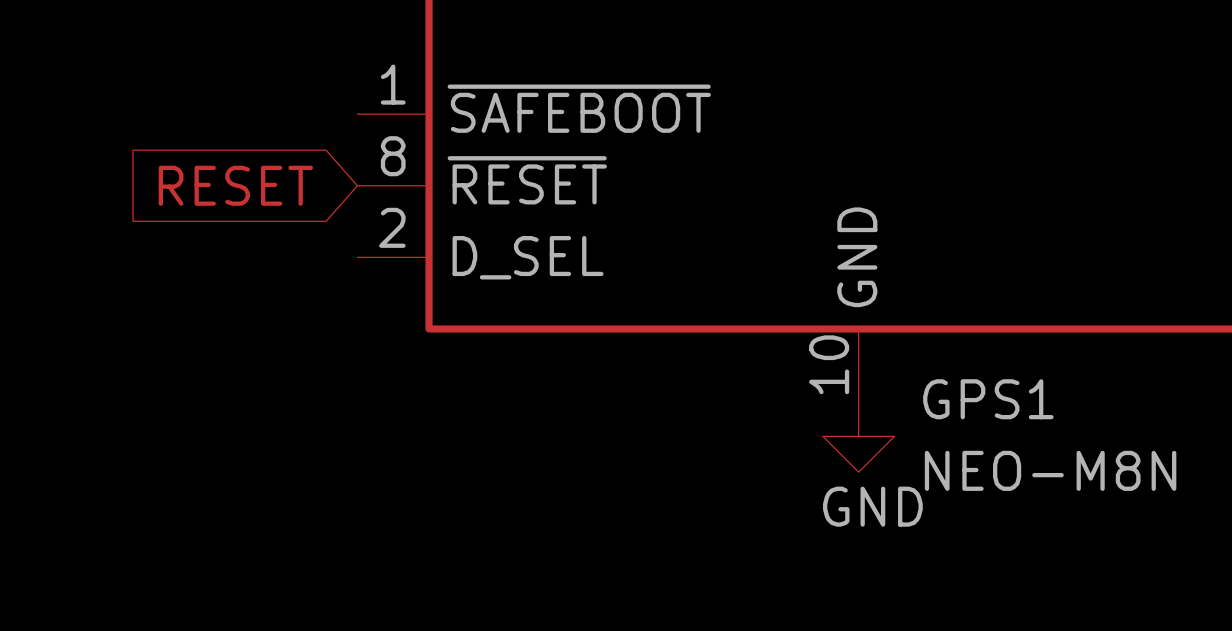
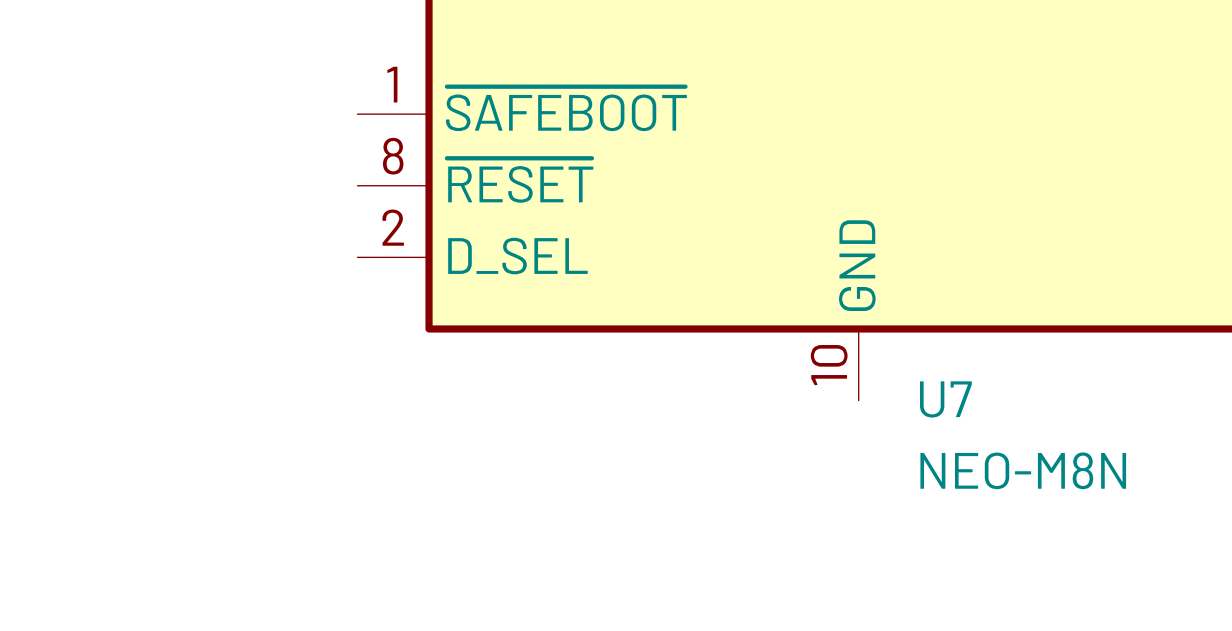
global label: RESET (235, 185) -> none
GPS1 name: GPS1 (988, 399) -> U7 (945, 399)
power symbol: GND (858, 436) -> none

